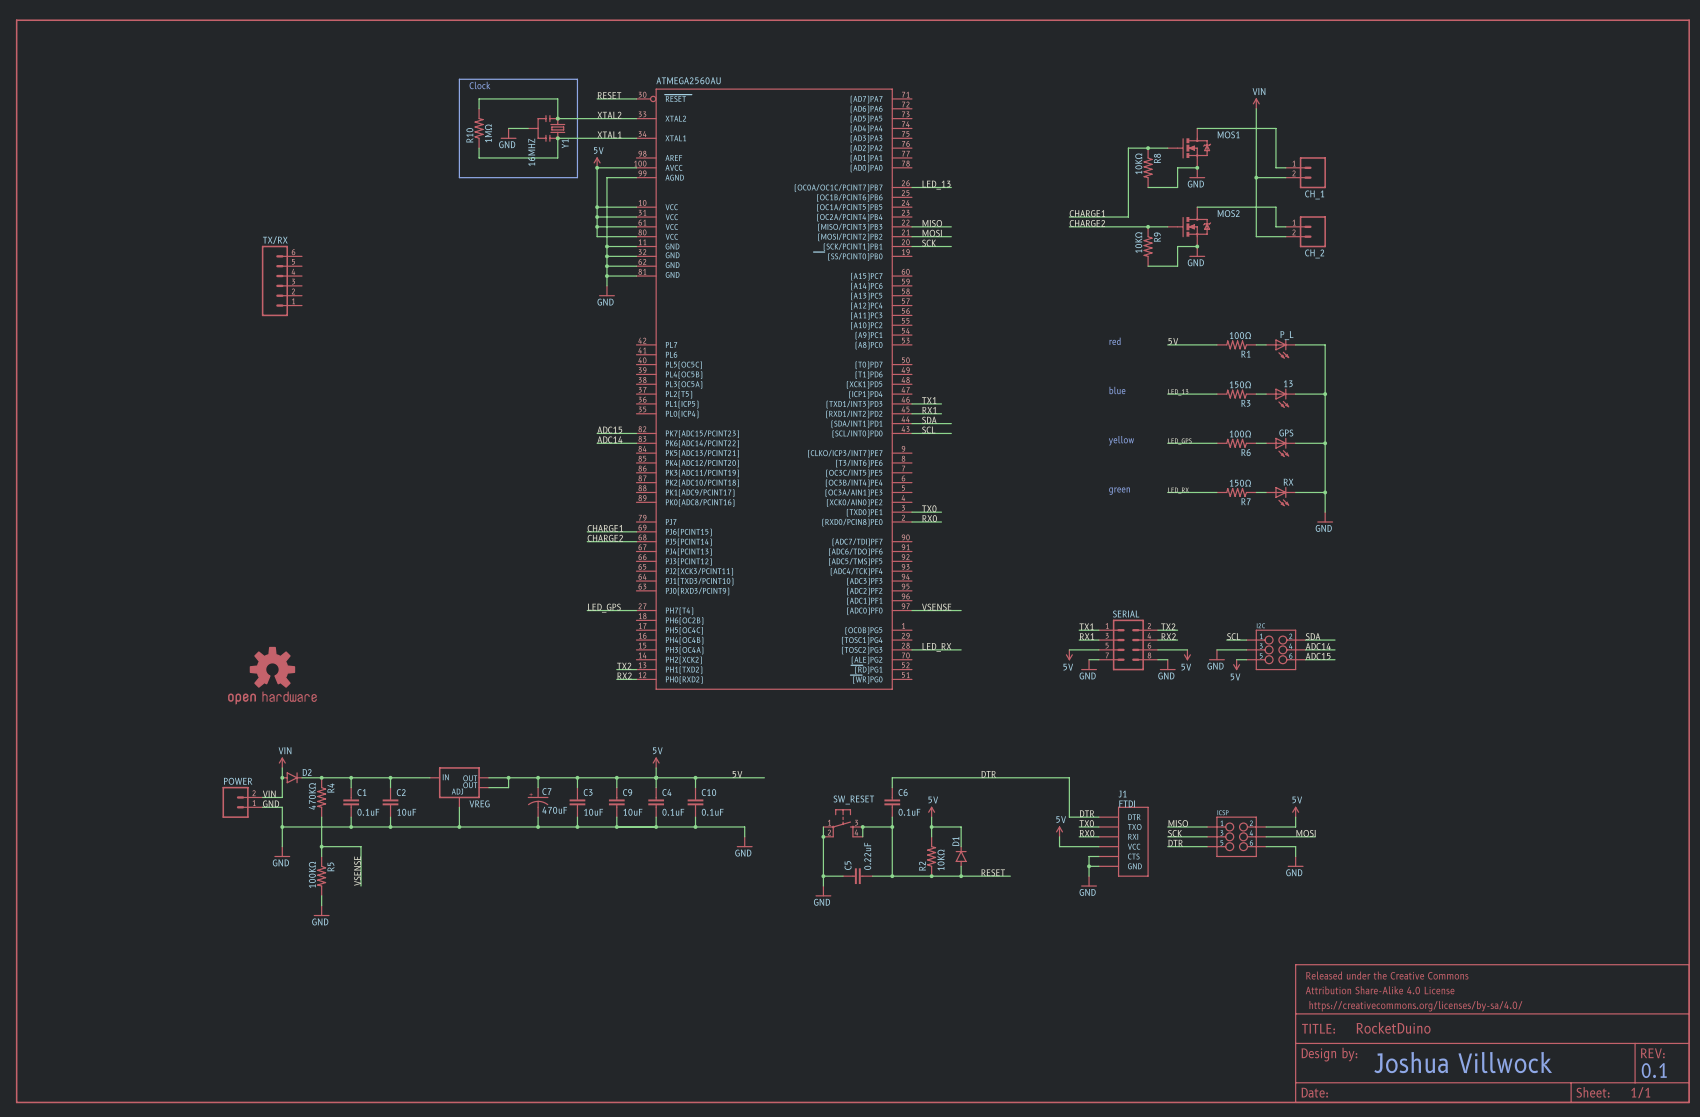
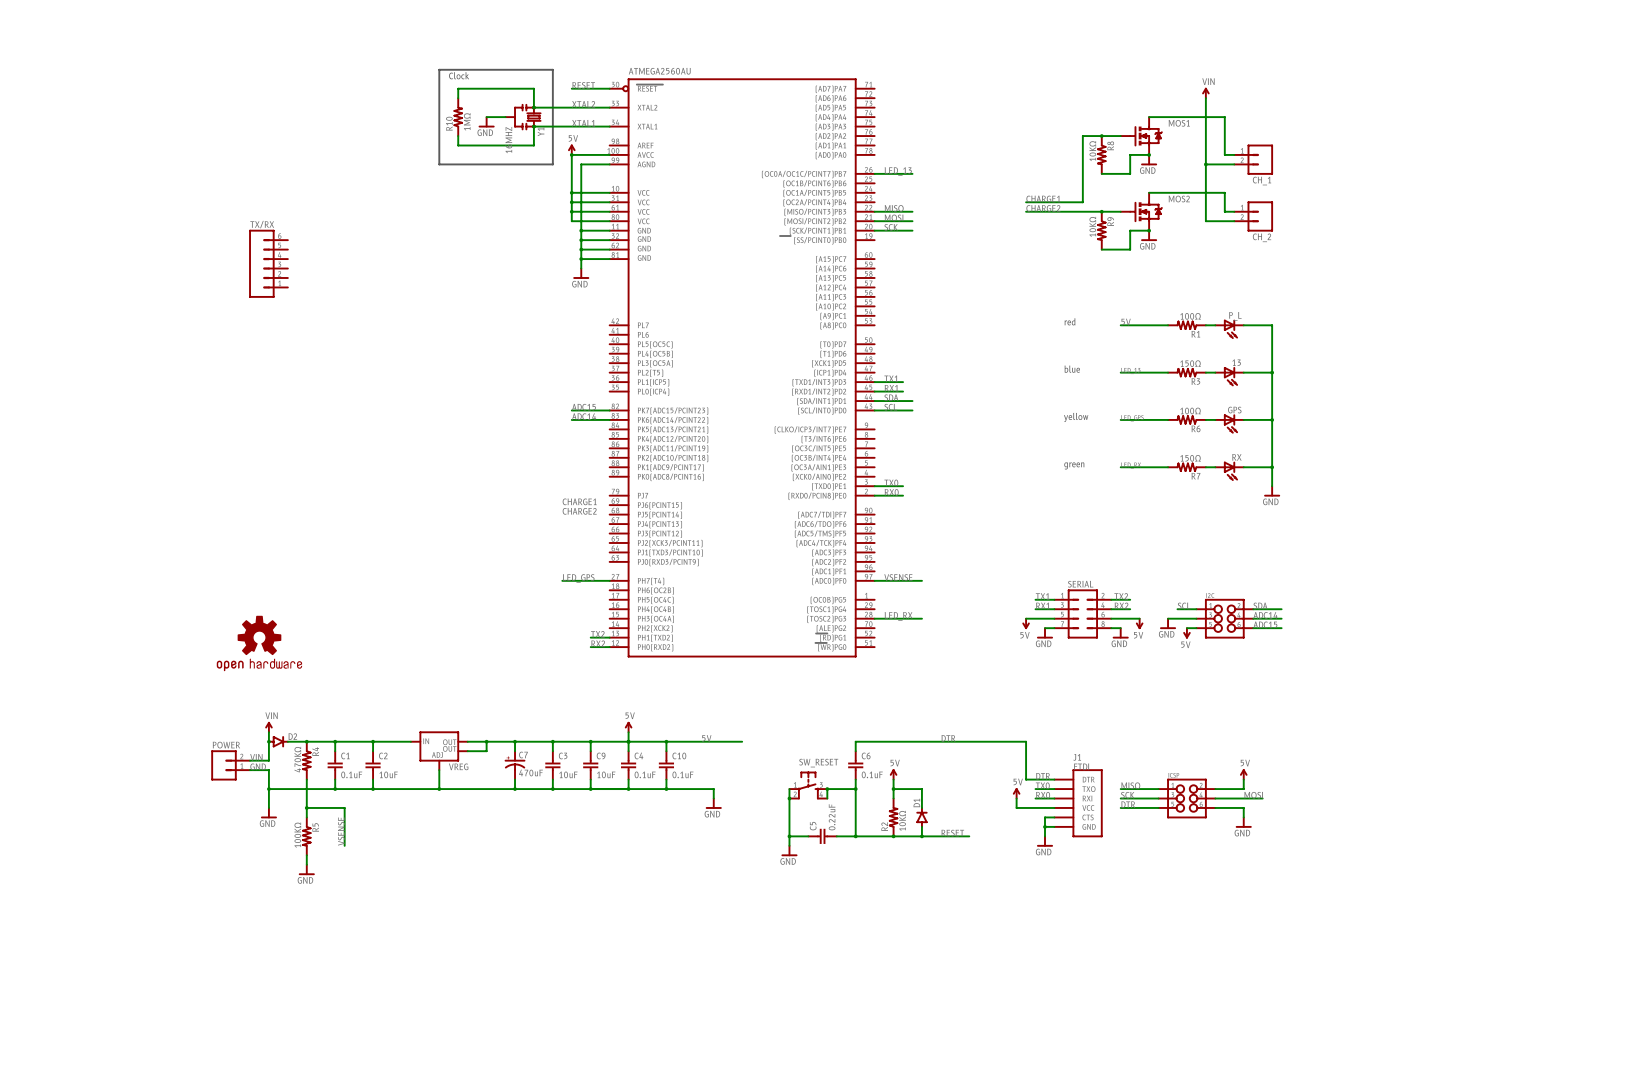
wire: (587, 531) (636, 531) -> none
wire: (587, 541) (636, 541) -> none
part: (852, 561) -> none
wire: none -> (732, 741) (742, 741)
part: (1492, 1033) -> none
text: Joshua Villwock (1463, 1062) -> none
text: 0.1 (1654, 1070) -> none

